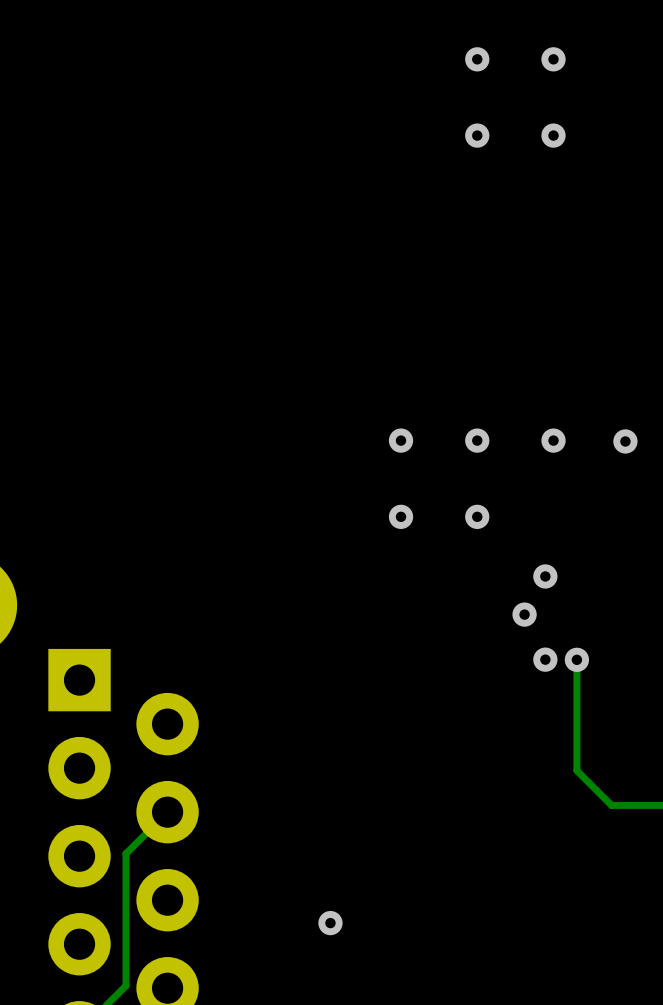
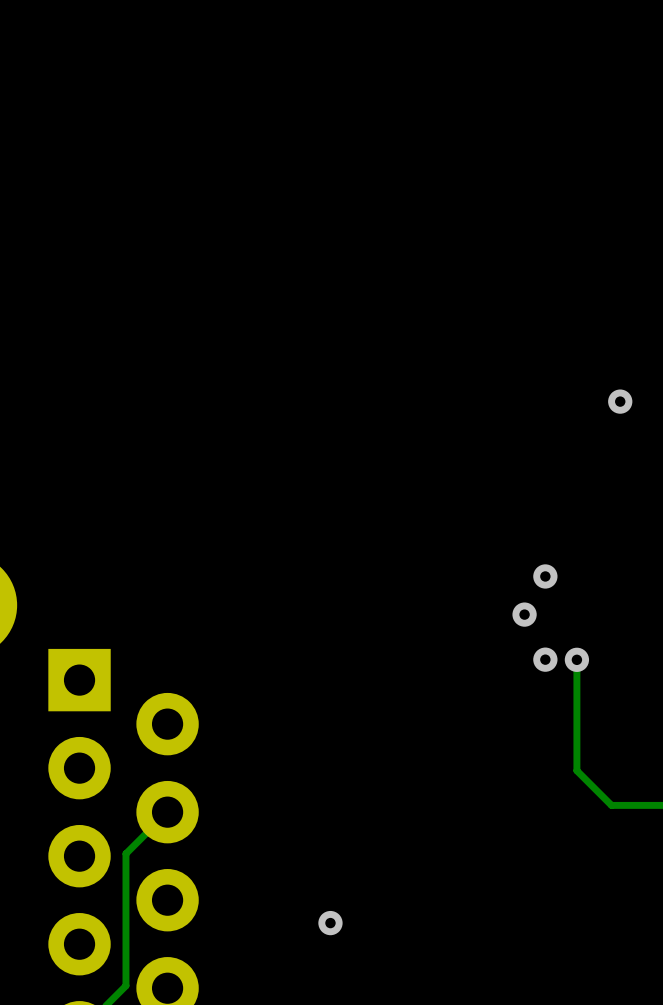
via: (477, 59) -> none
via: (553, 59) -> none
via: (477, 135) -> none
via: (553, 135) -> none
via: none -> (620, 401)
via: (401, 440) -> none
via: (477, 440) -> none
via: (553, 440) -> none
via: (625, 441) -> none
via: (401, 516) -> none
via: (477, 516) -> none

